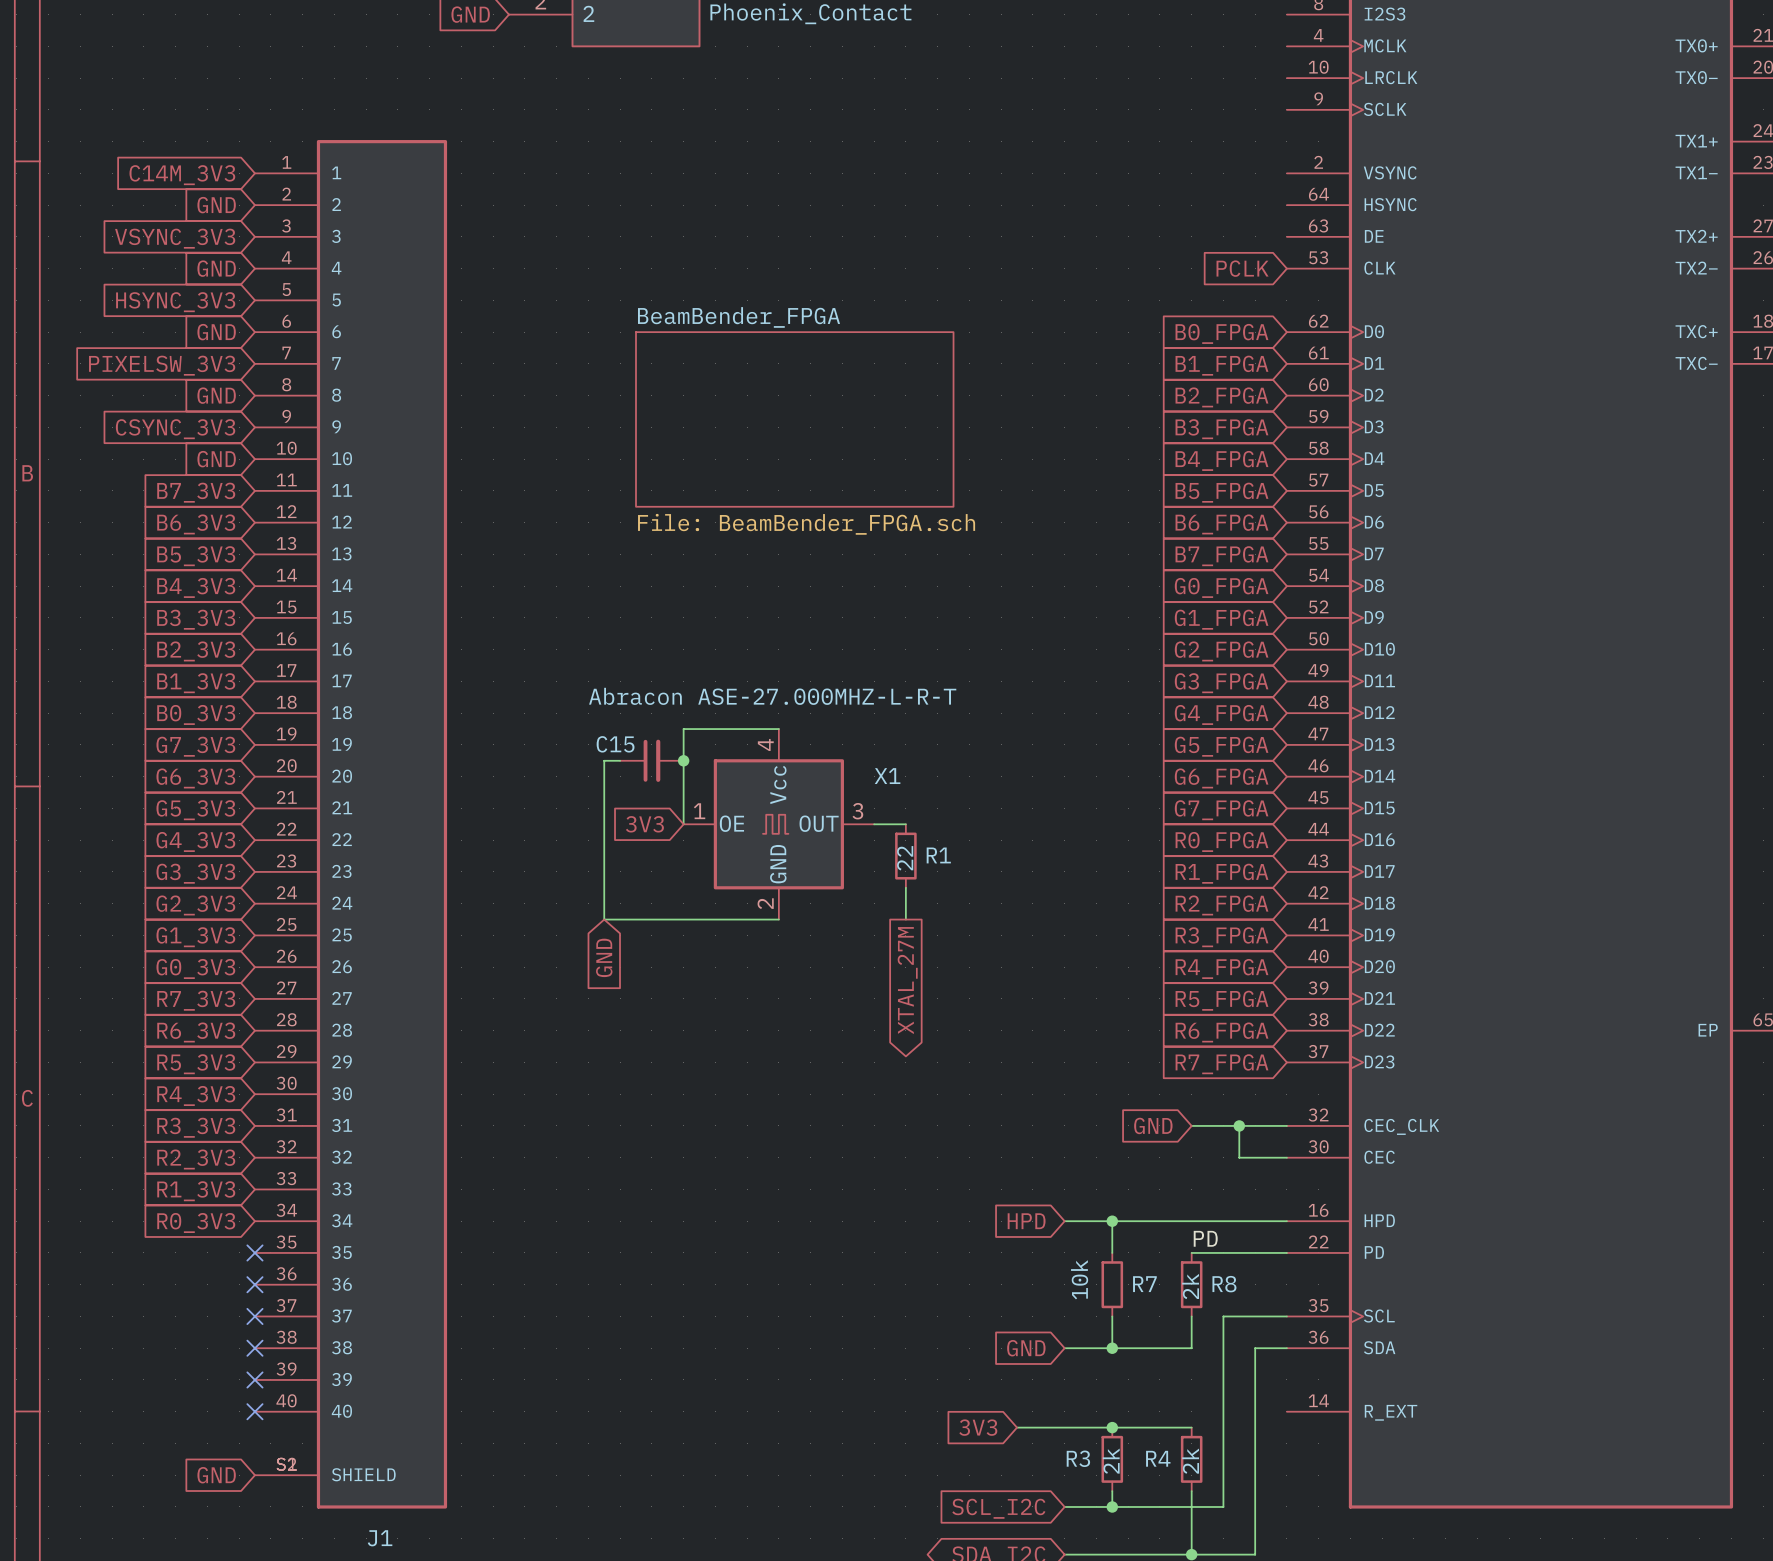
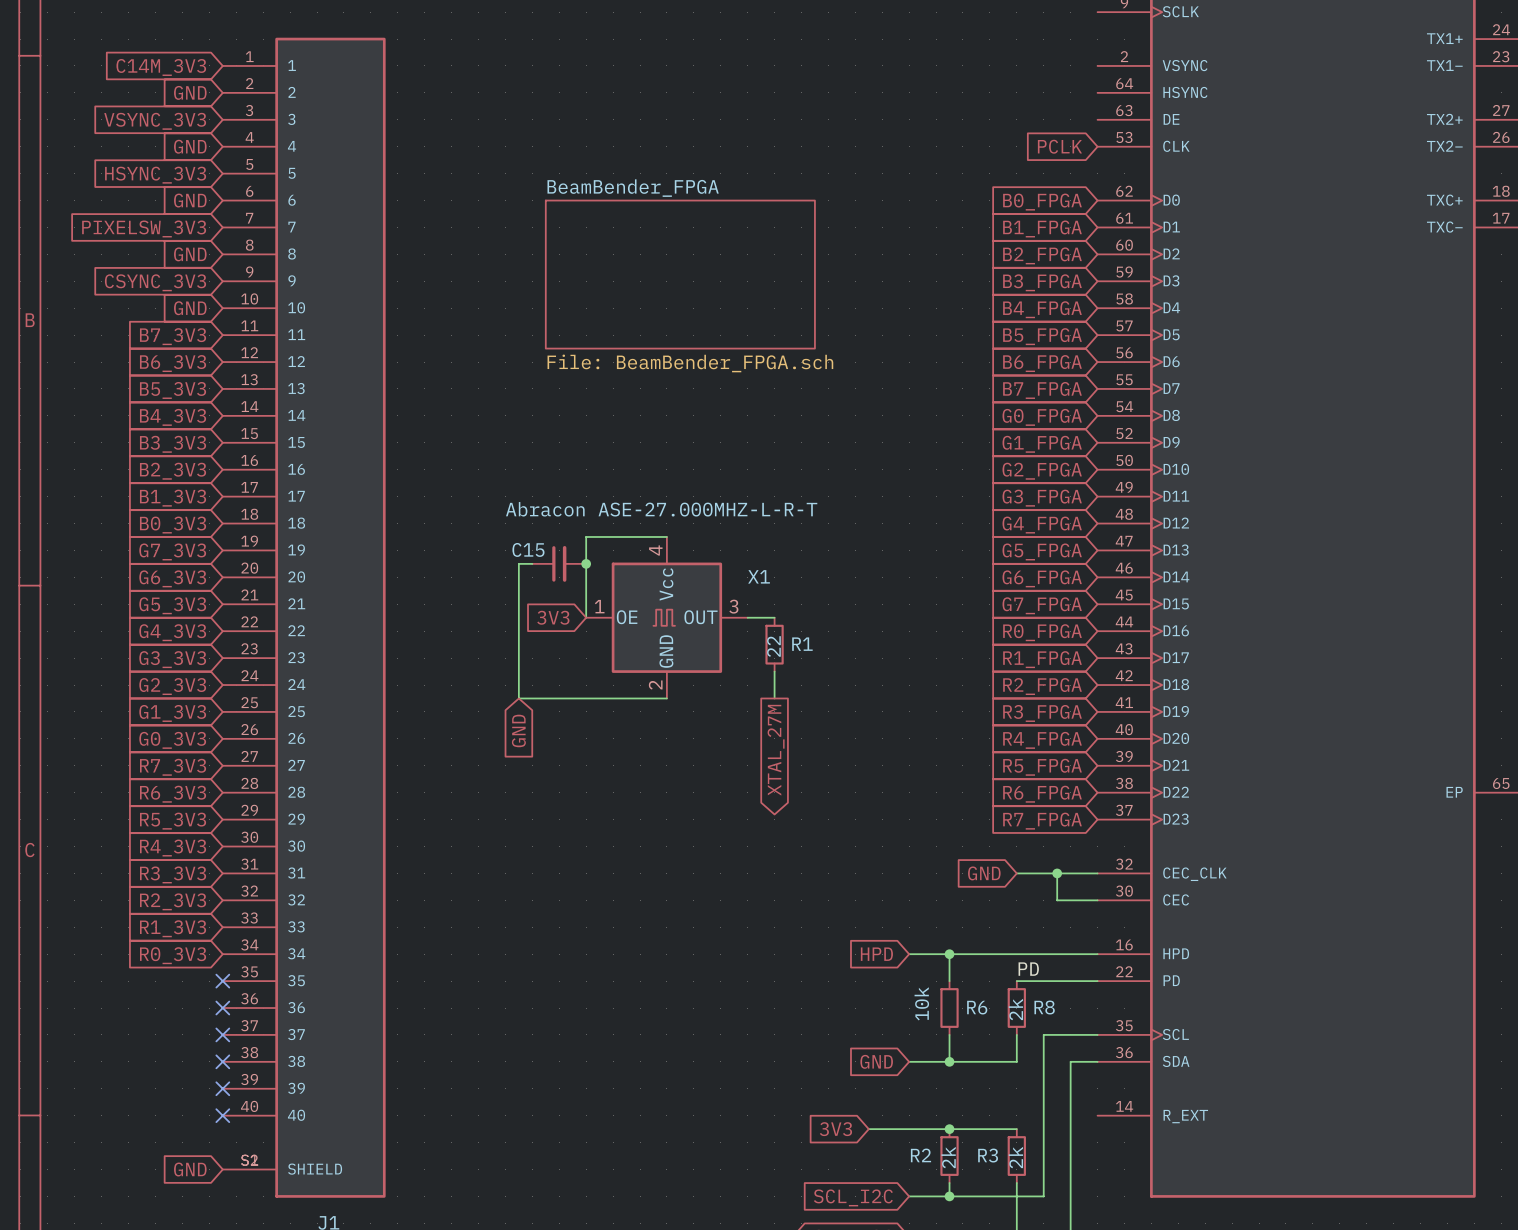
R7 name: R7 (1144, 1284) -> R6 (977, 1007)
R3 name: R3 (1078, 1458) -> R2 (920, 1155)
R4 name: R4 (1158, 1458) -> R3 (988, 1155)

